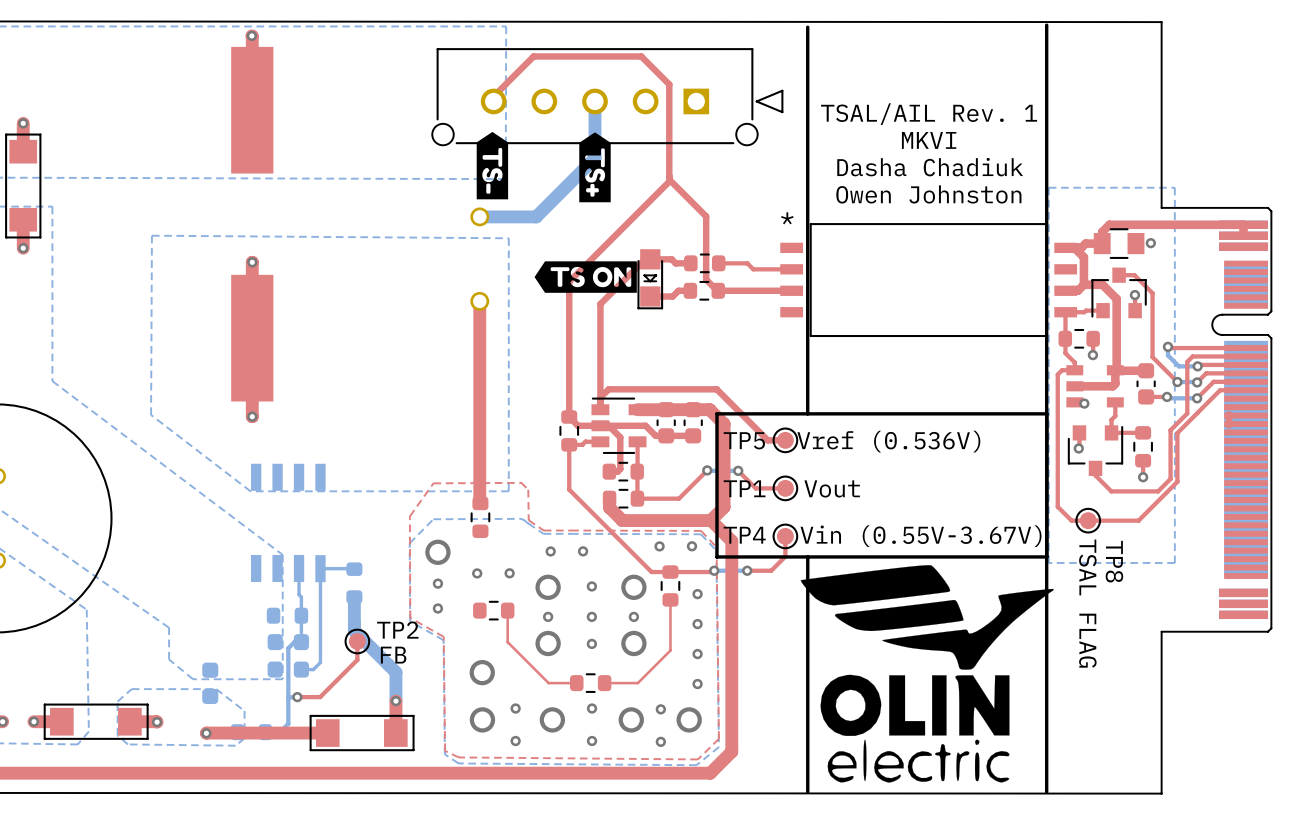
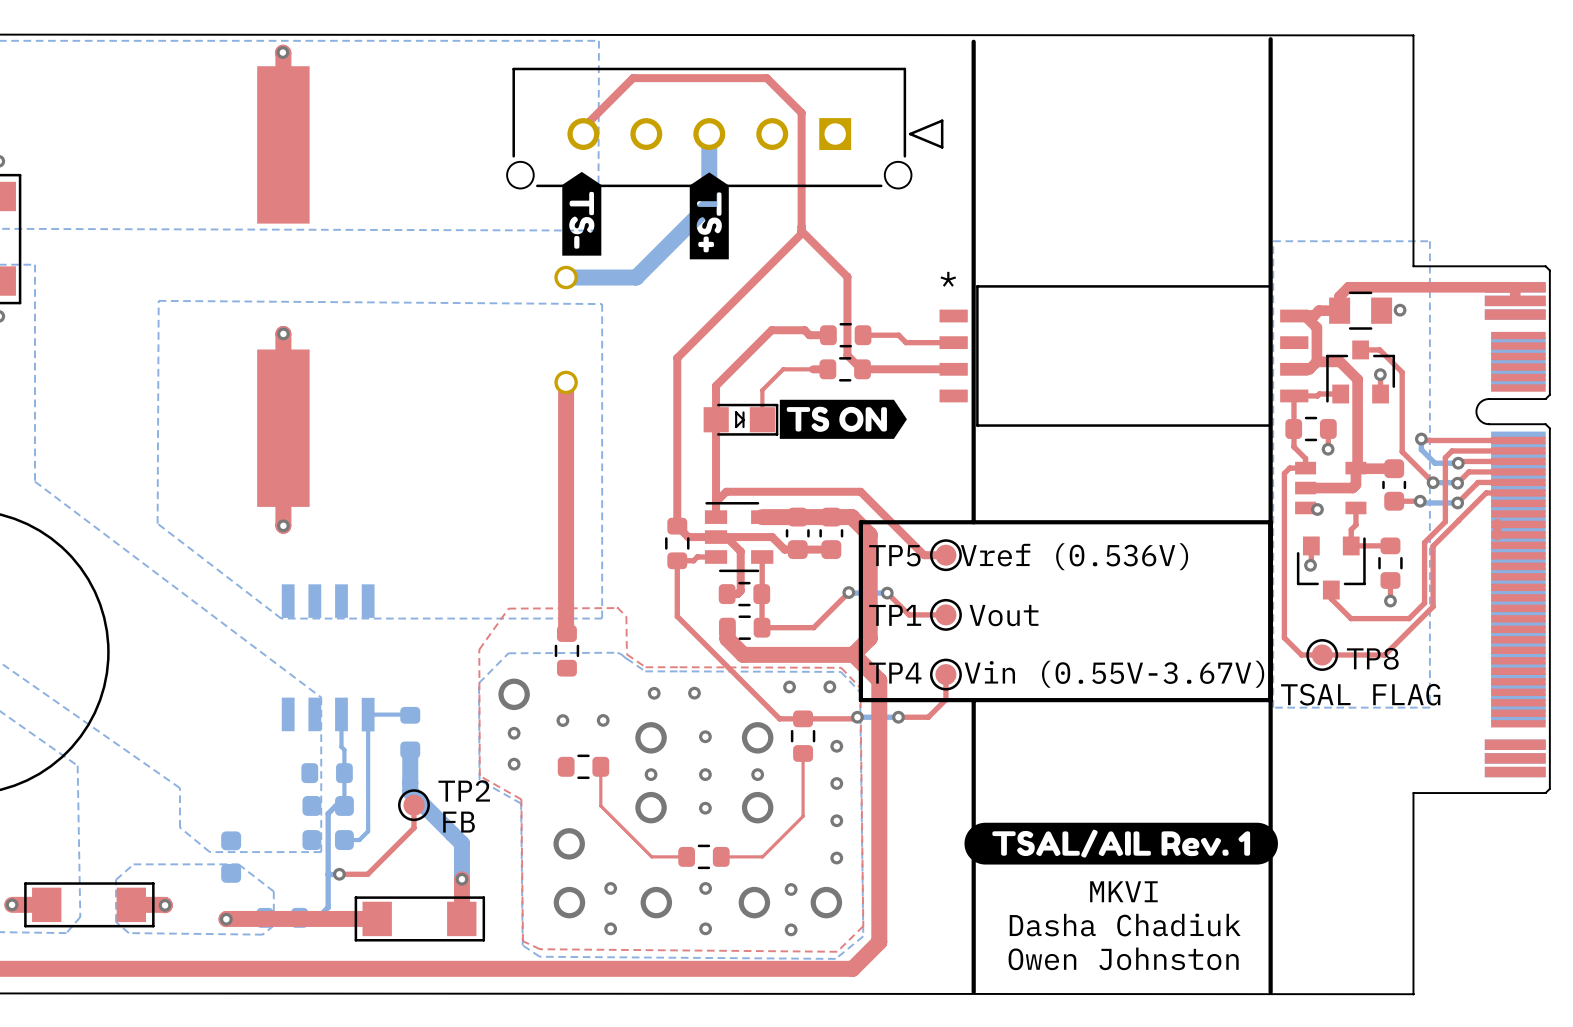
text: TSAL/AIL Rev. 1 (929, 114) -> none
text: MKVI (929, 140) -> none
text: Dasha Chadiuk (930, 167) -> none
text: Owen Johnston (928, 194) -> none
drawing: [534, 261, 637, 293] -> none
part rotation: 0° (650, 279) -> 90° counterclockwise (740, 419)
part position: (650, 279) -> (740, 419)
top track: (678, 290) (672, 296) (650, 296) -> (813, 369) (783, 369) (762, 390) (762, 419)
drawing: none -> [779, 399, 907, 439]
TP8 name rotation: 0° (1114, 561) -> 90° counterclockwise (1372, 658)
drawing shape: [800, 565, 1054, 783] -> [964, 822, 1278, 865]
text rotation: 0° (1087, 603) -> 90° counterclockwise (1360, 694)
text: none -> MKVI (1123, 891)
text: none -> Dasha Chadiuk (1125, 924)
text: none -> Owen Johnston (1123, 958)

